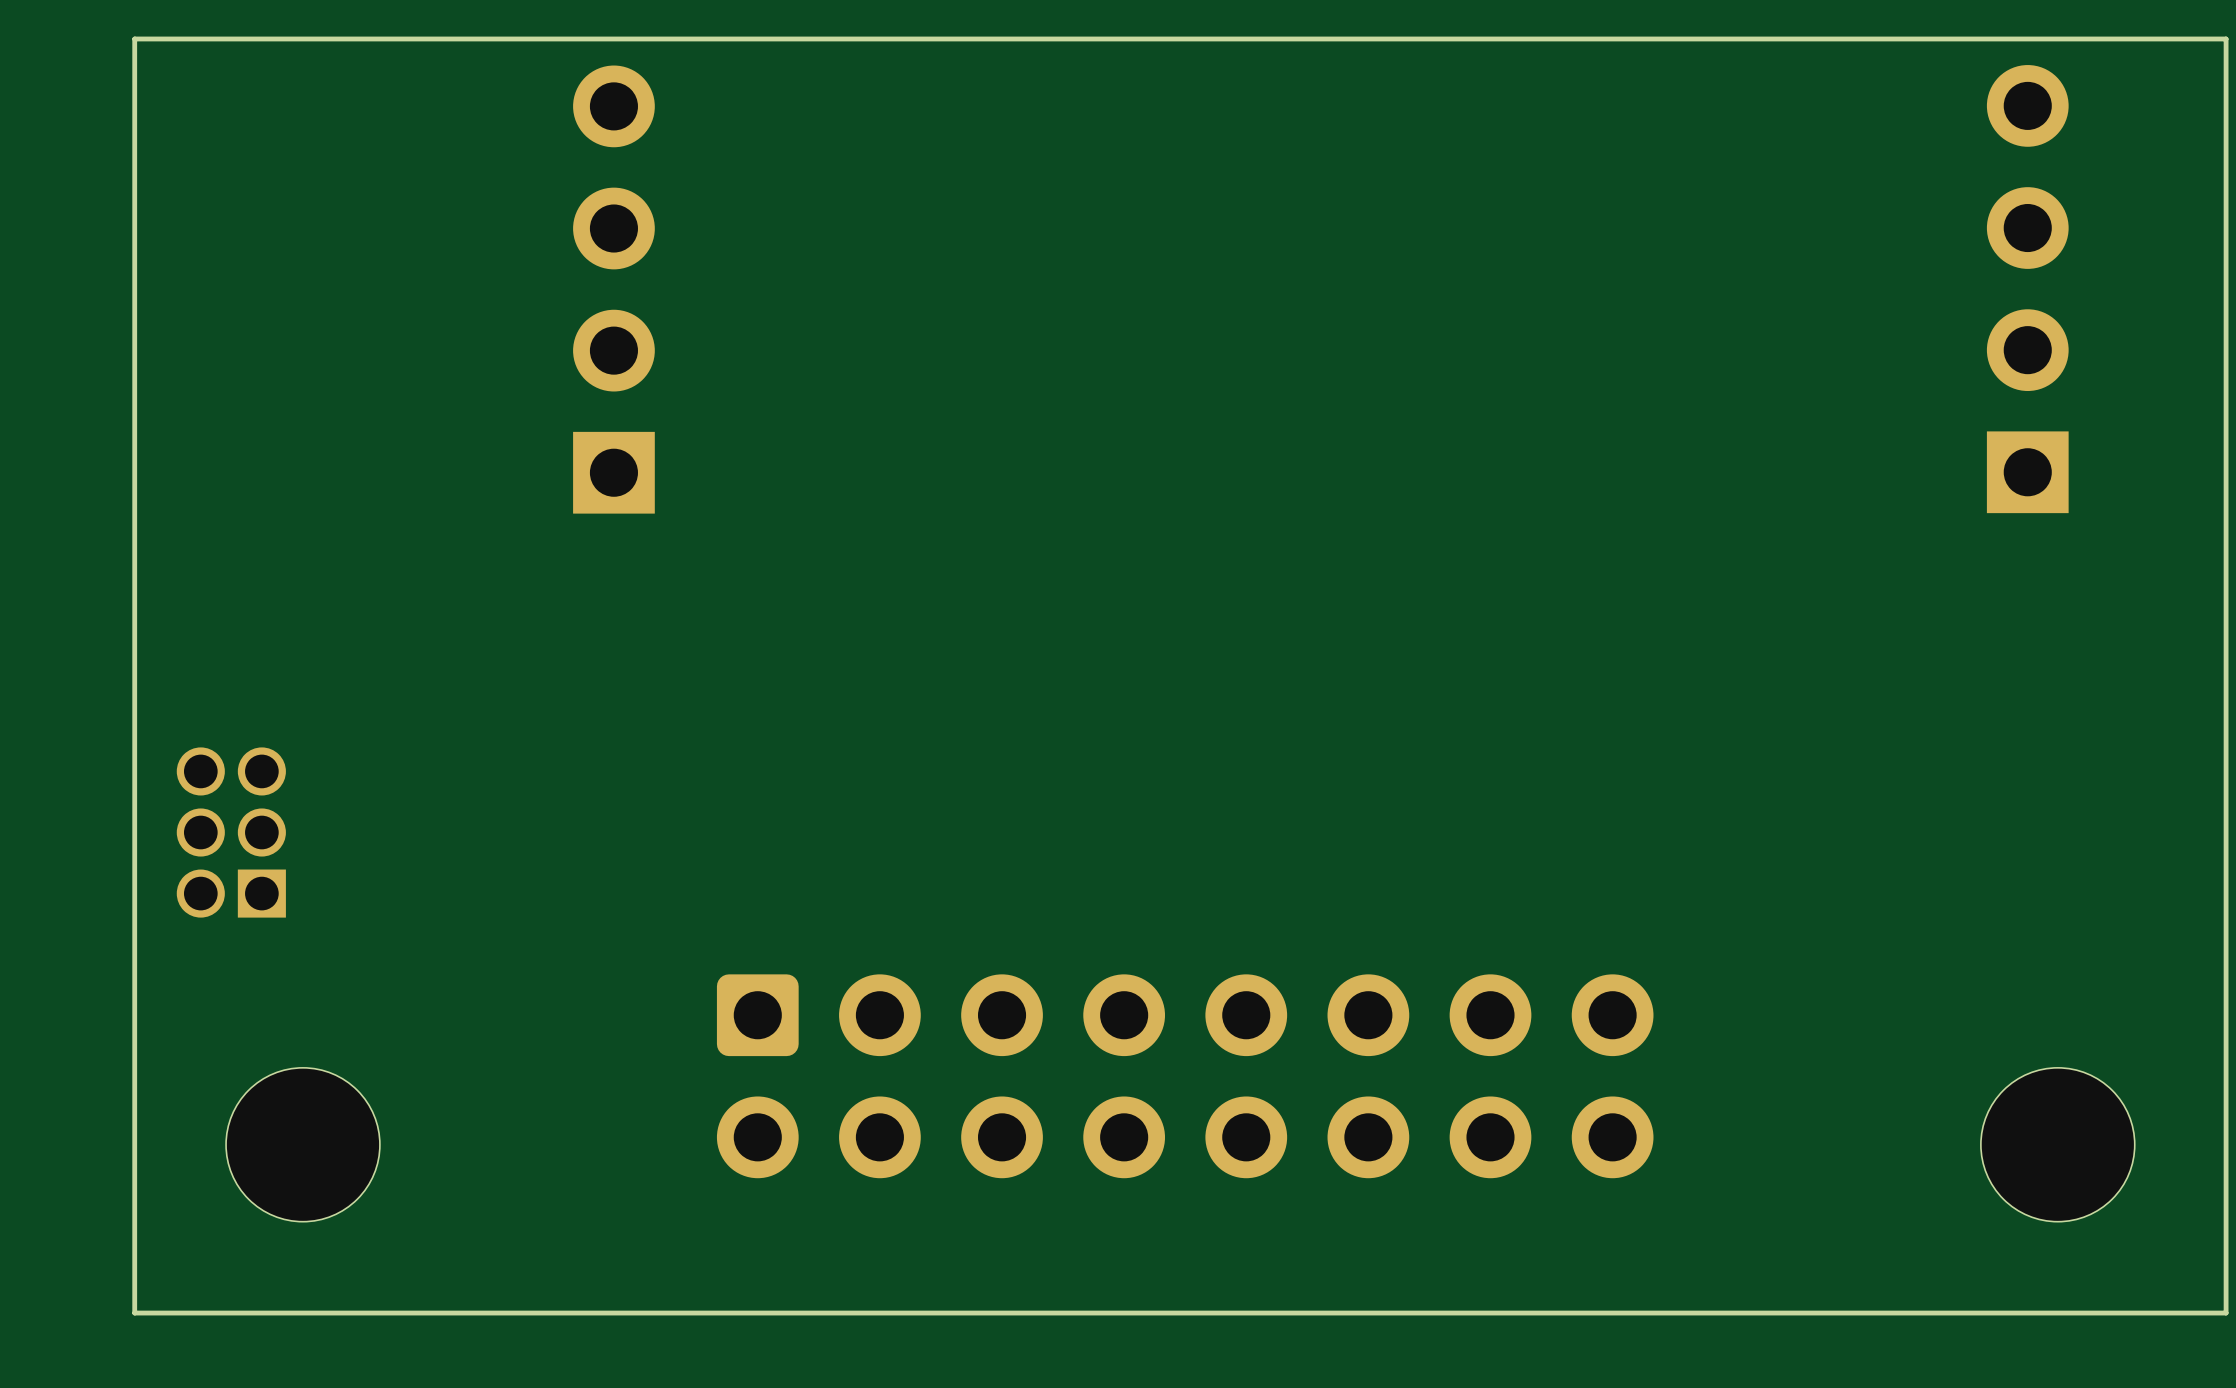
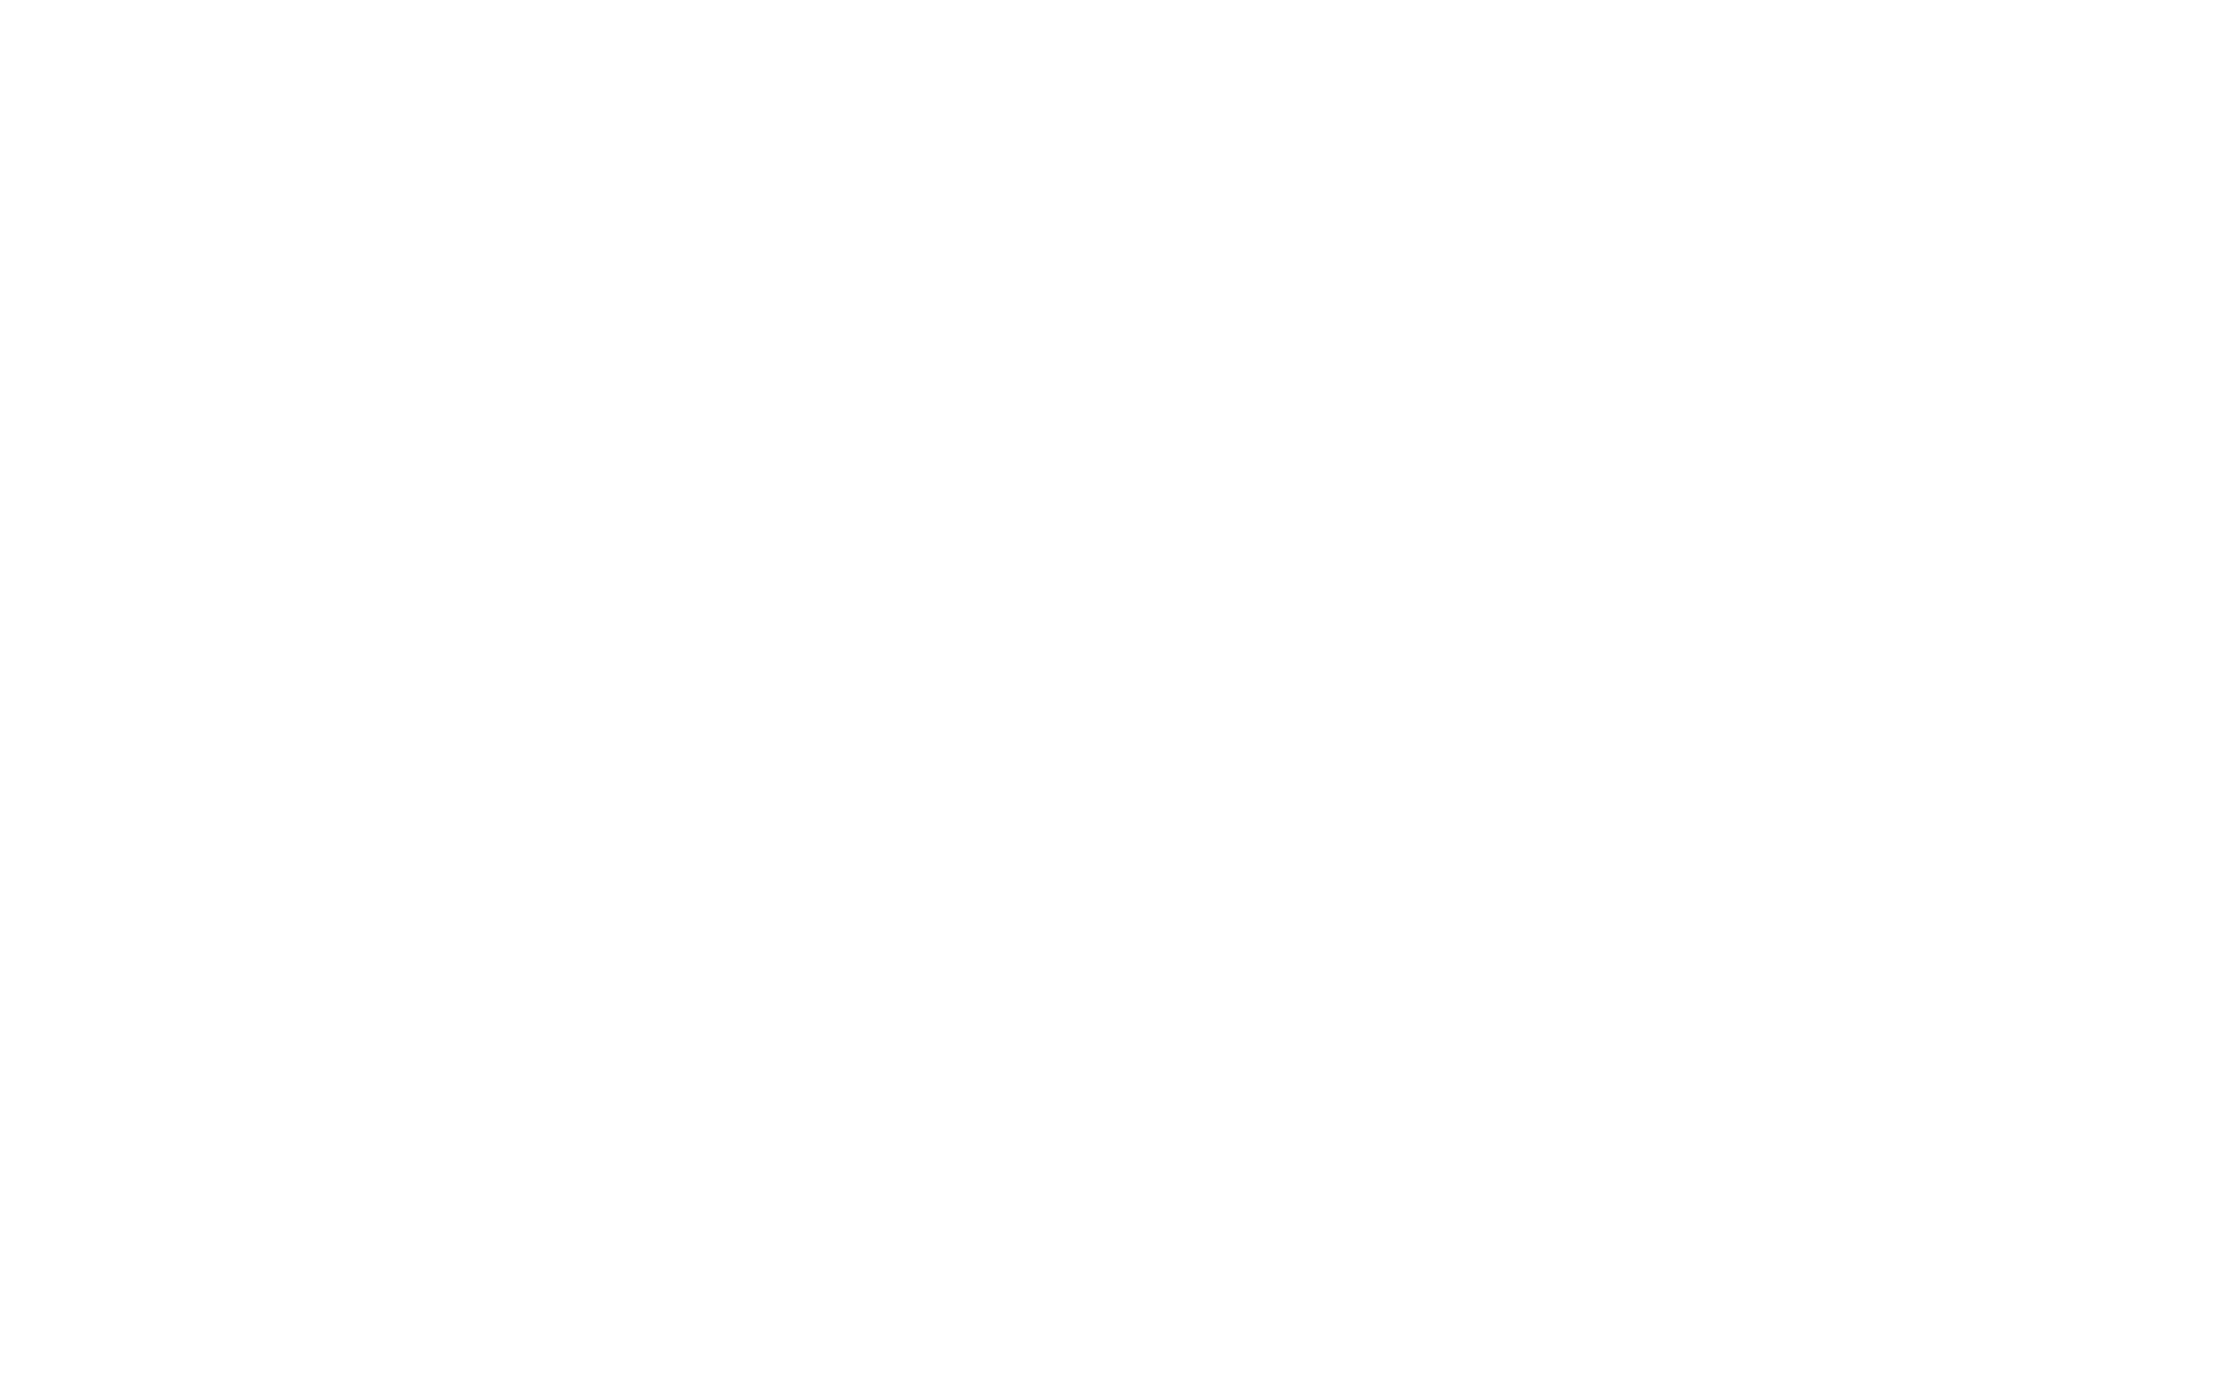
board edge: (2226, 38) (2226, 1313) (134, 1313) (134, 38) (2226, 38) -> none
part: (613, 289) -> none
part: (2027, 289) -> none
part: (231, 832) -> none
part: (1185, 1076) -> none
part: (302, 1144) -> none
part: (2057, 1144) -> none

